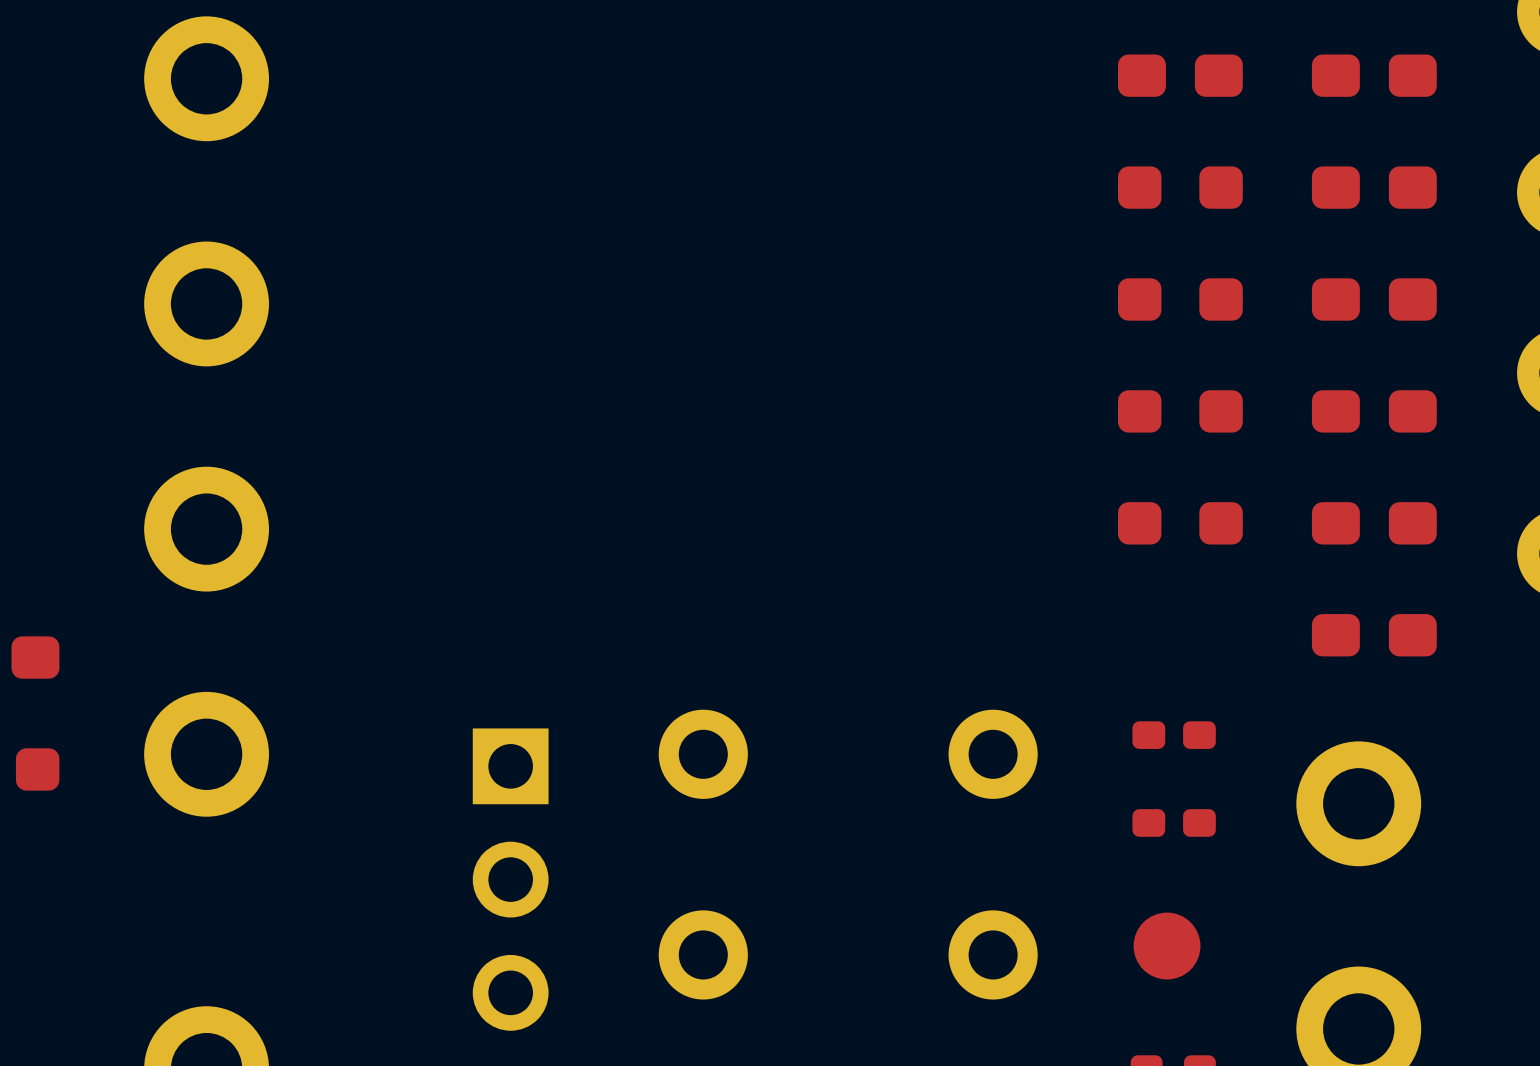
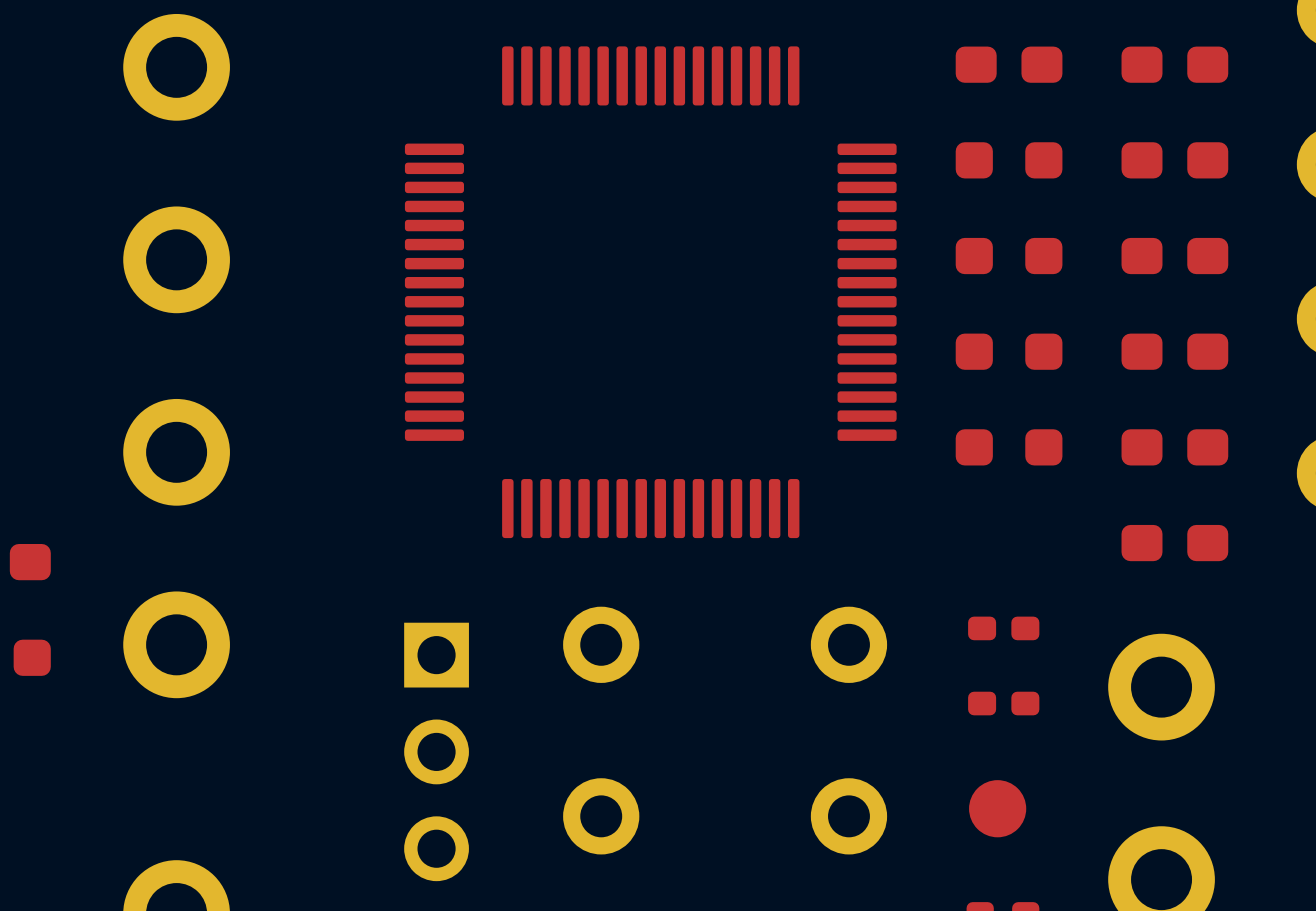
part: none -> (650, 292)

